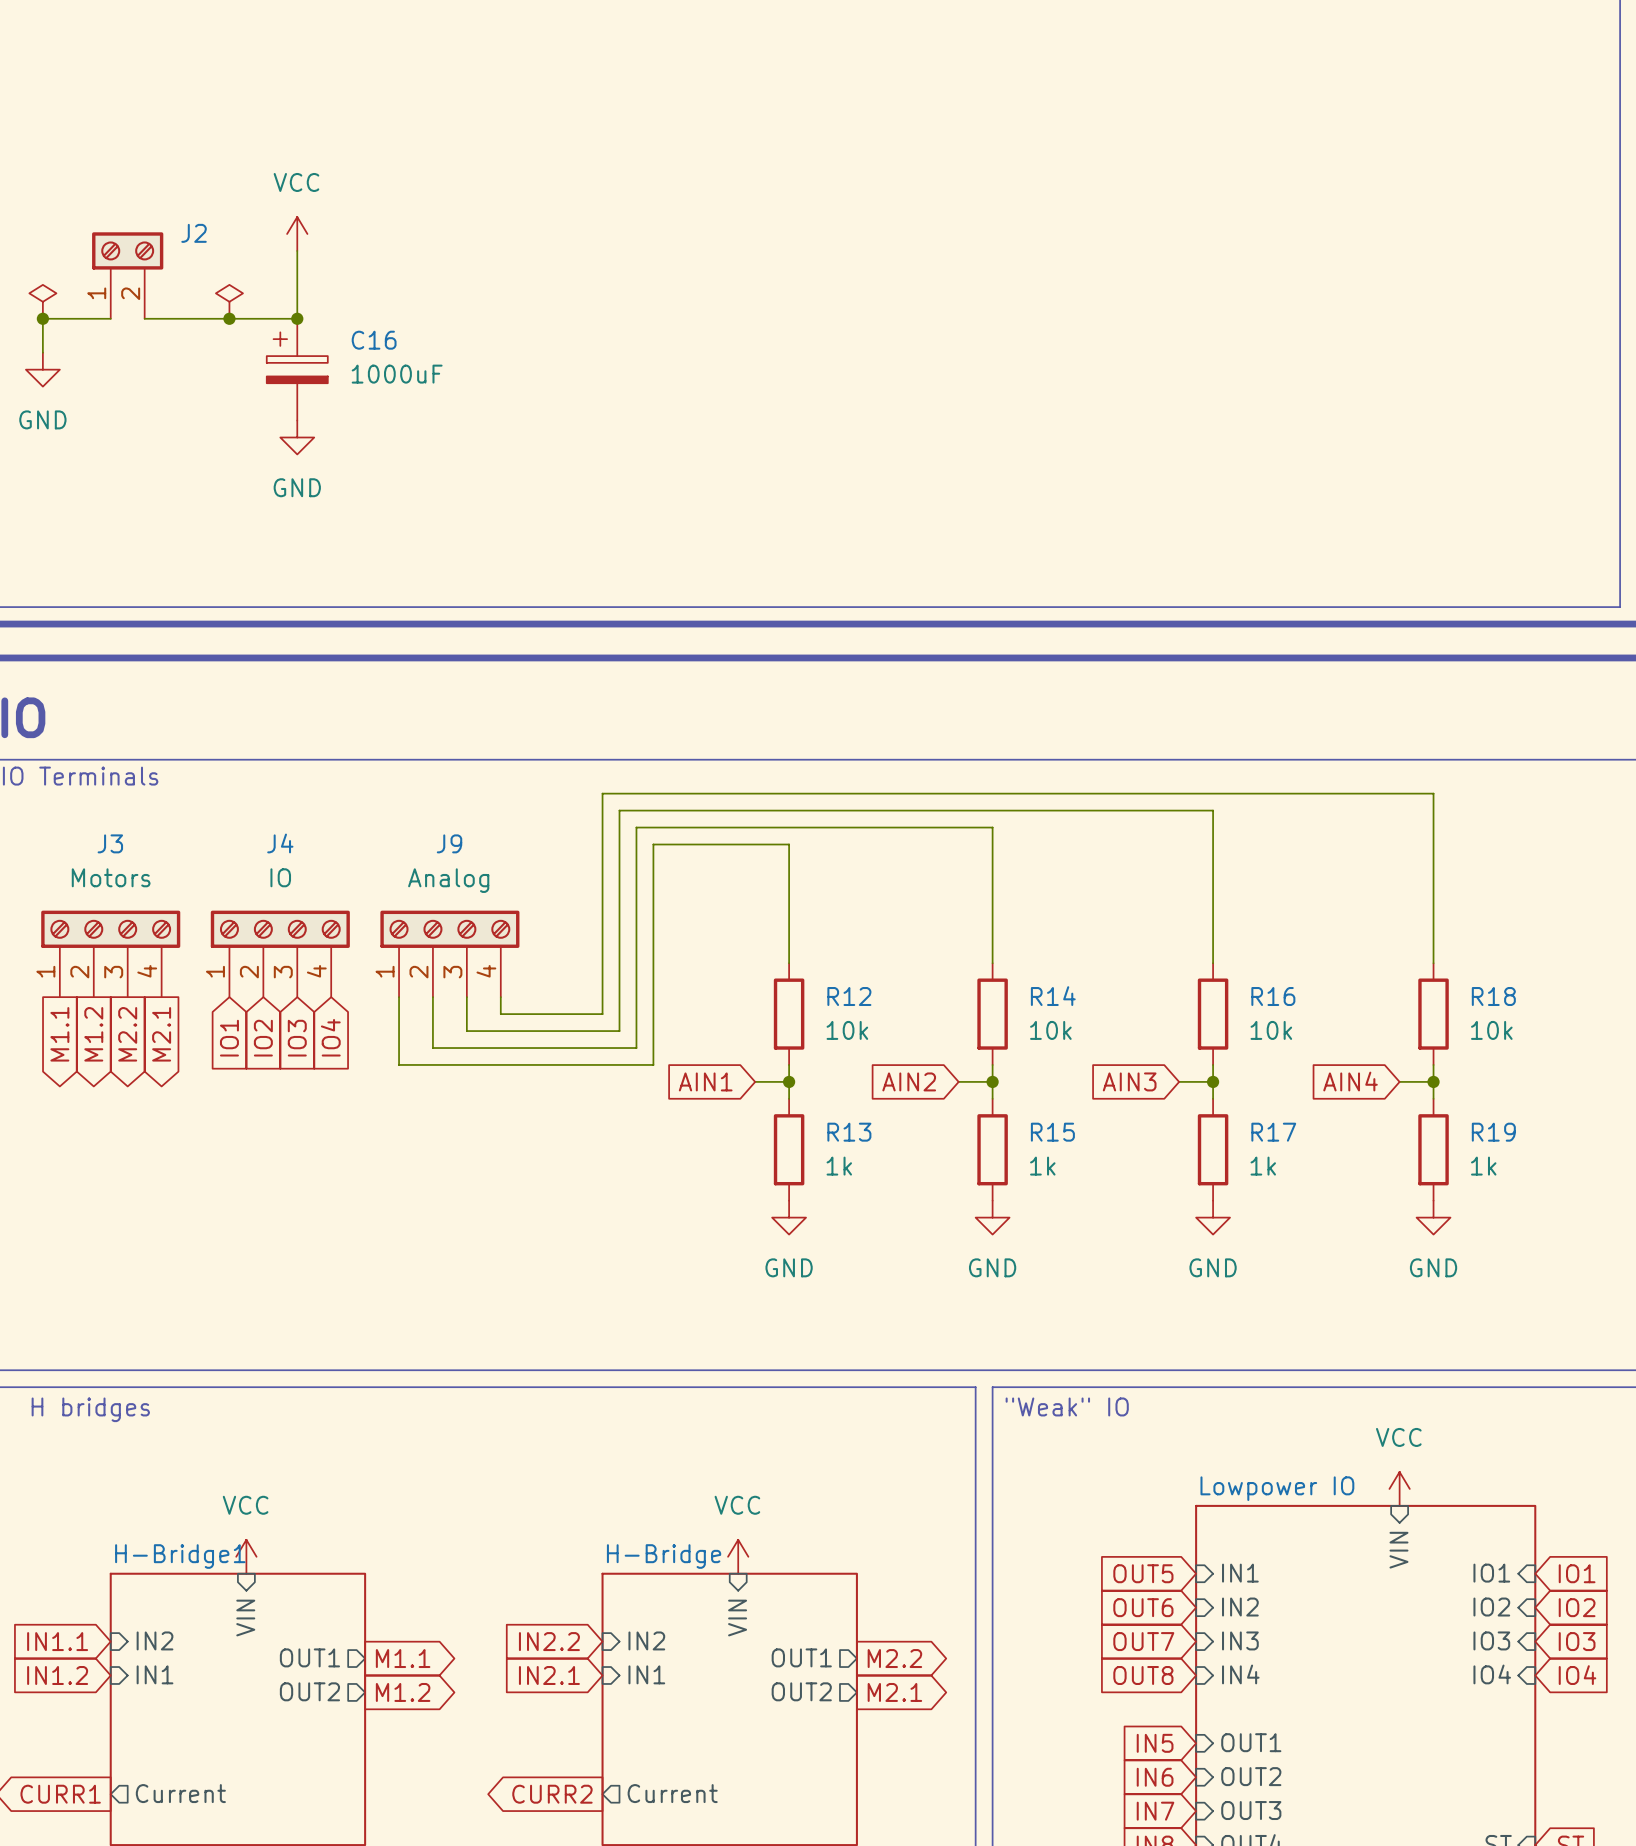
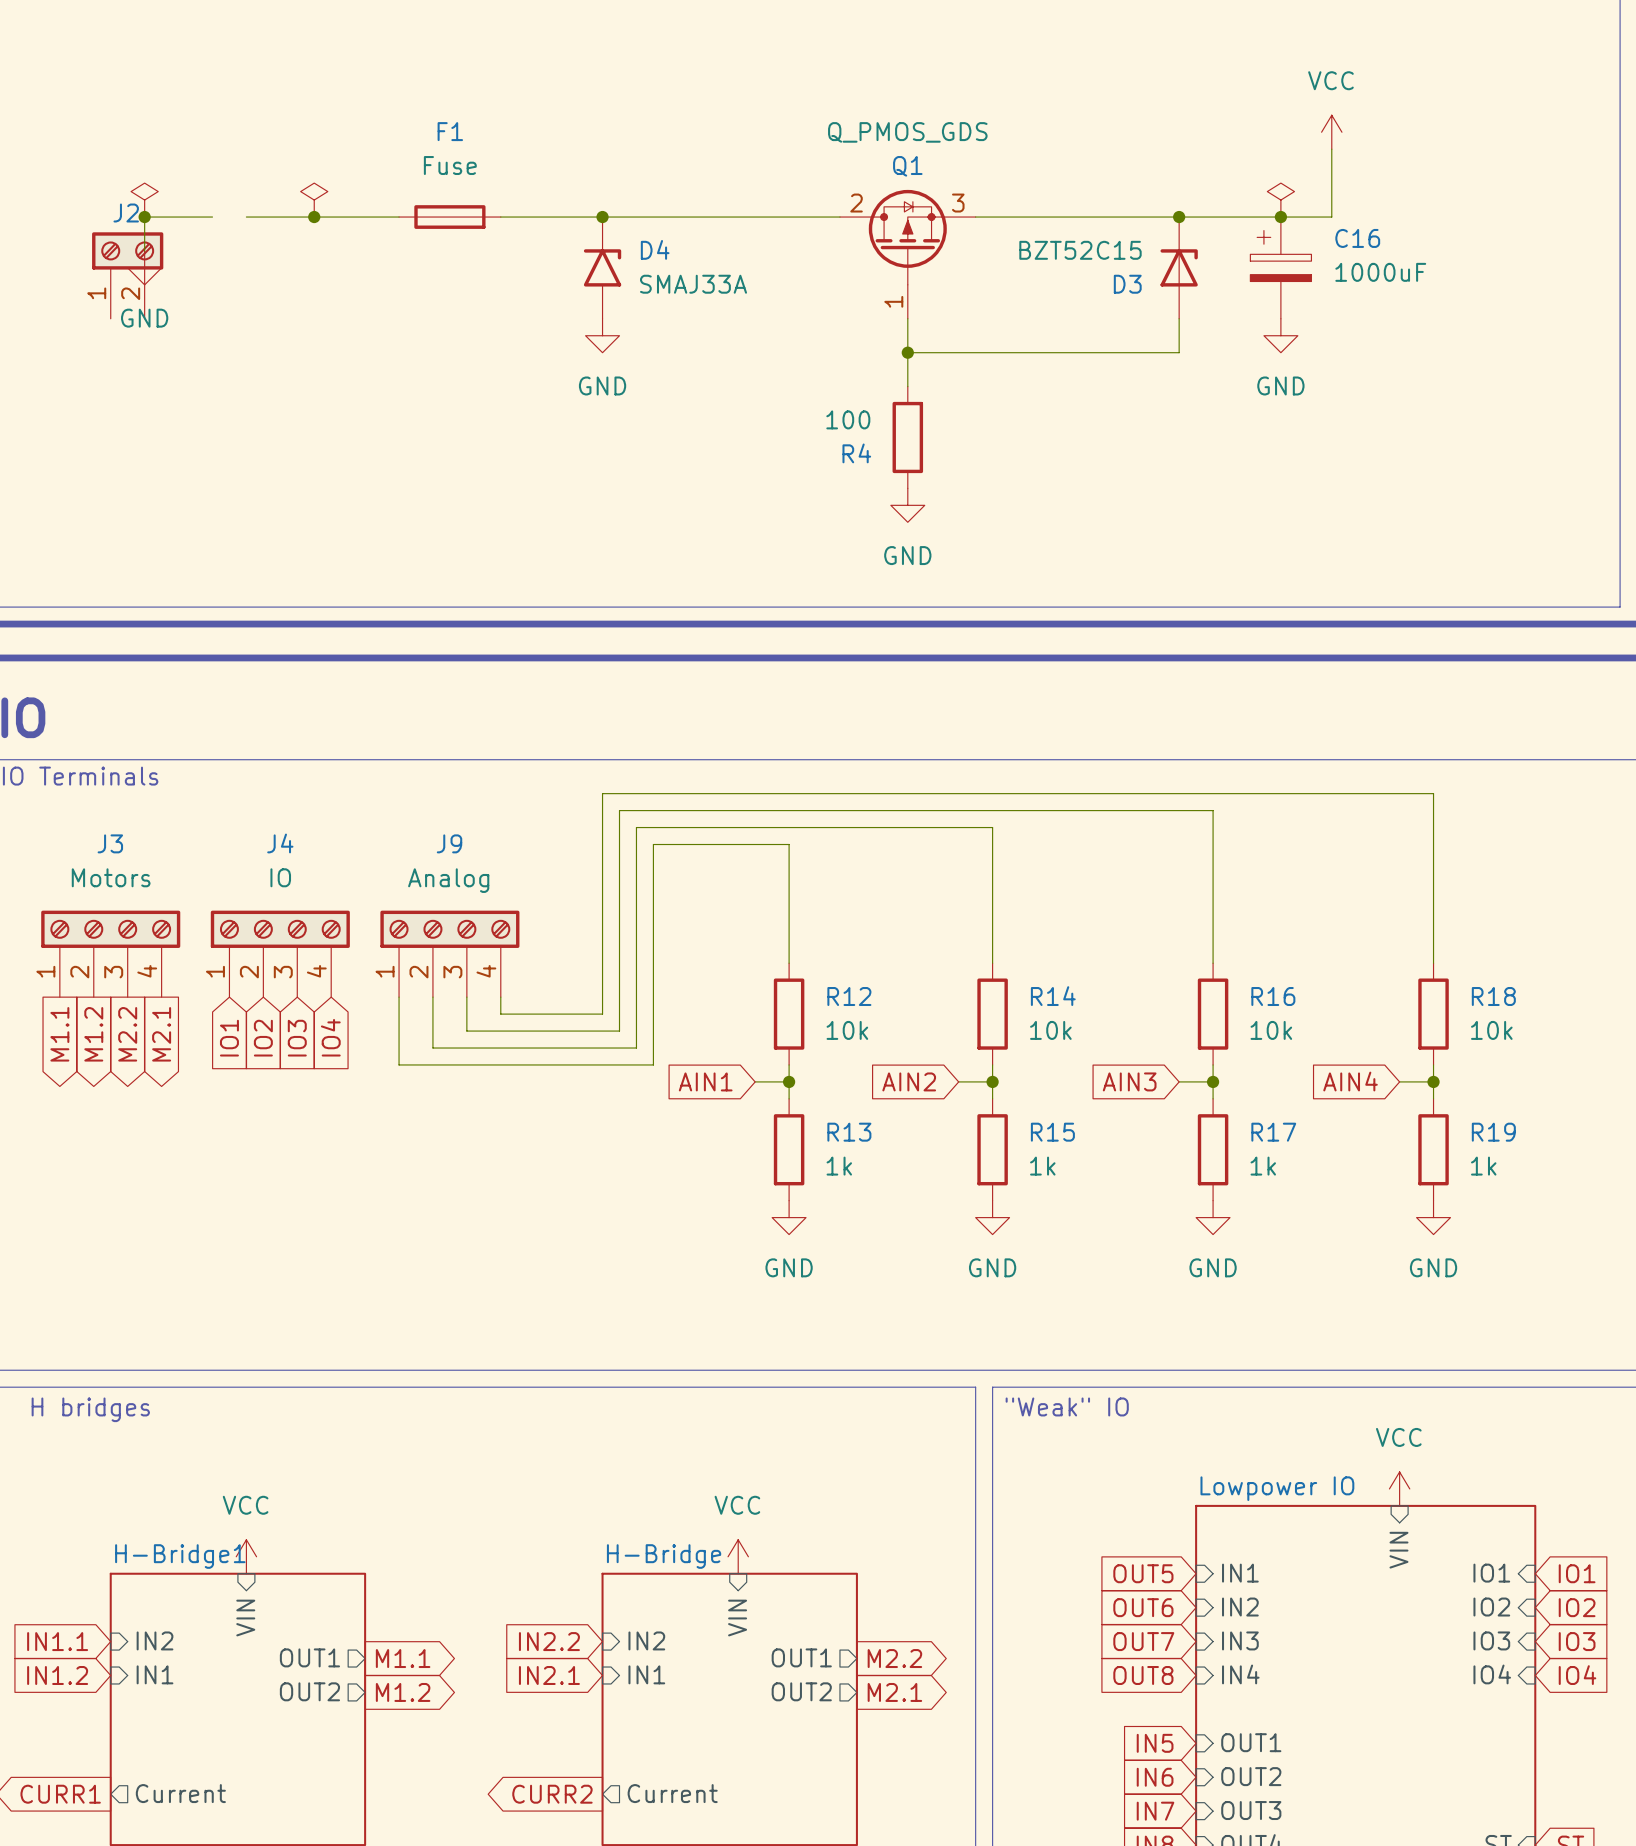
power symbol: none -> VCC (1331, 132)
wire: none -> (1331, 149) (1331, 217) (975, 217)
power symbol: none -> (144, 200)
power symbol: none -> (314, 200)
power symbol: none -> (1280, 200)
junction: none -> (144, 217)
wire: none -> (246, 217) (399, 217)
junction: none -> (314, 217)
F1: none -> Fuse (449, 217)
wire: none -> (500, 217) (839, 217)
junction: none -> (602, 217)
junction: none -> (1179, 217)
junction: none -> (1280, 217)
J2 name position: J2 (194, 233) -> J2 (126, 213)
power symbol: VCC (297, 233) -> none
wire: (297, 250) (297, 318) (144, 318) -> none
Q1: none -> Q_PMOS_GDS (907, 254)
power symbol: none -> GND (144, 267)
D4: none -> SMAJ33A (602, 267)
D3: none -> BZT52C15 (1179, 267)
power symbol: (42, 301) -> none
power symbol: (229, 301) -> none
junction: (42, 318) -> none
wire: (110, 318) (42, 318) (42, 352) -> (212, 217) (144, 217) (144, 250)
junction: (229, 318) -> none
junction: (297, 318) -> none
wire: none -> (907, 318) (907, 386)
wire: none -> (1179, 318) (1179, 352) (907, 352)
power symbol: none -> GND (602, 335)
power symbol: none -> GND (1280, 335)
junction: none -> (907, 352)
power symbol: GND (42, 369) -> none
C16 position: (297, 369) -> (1280, 267)
power symbol: GND (297, 437) -> none
R4: none -> 100 (907, 437)
power symbol: none -> GND (907, 505)

